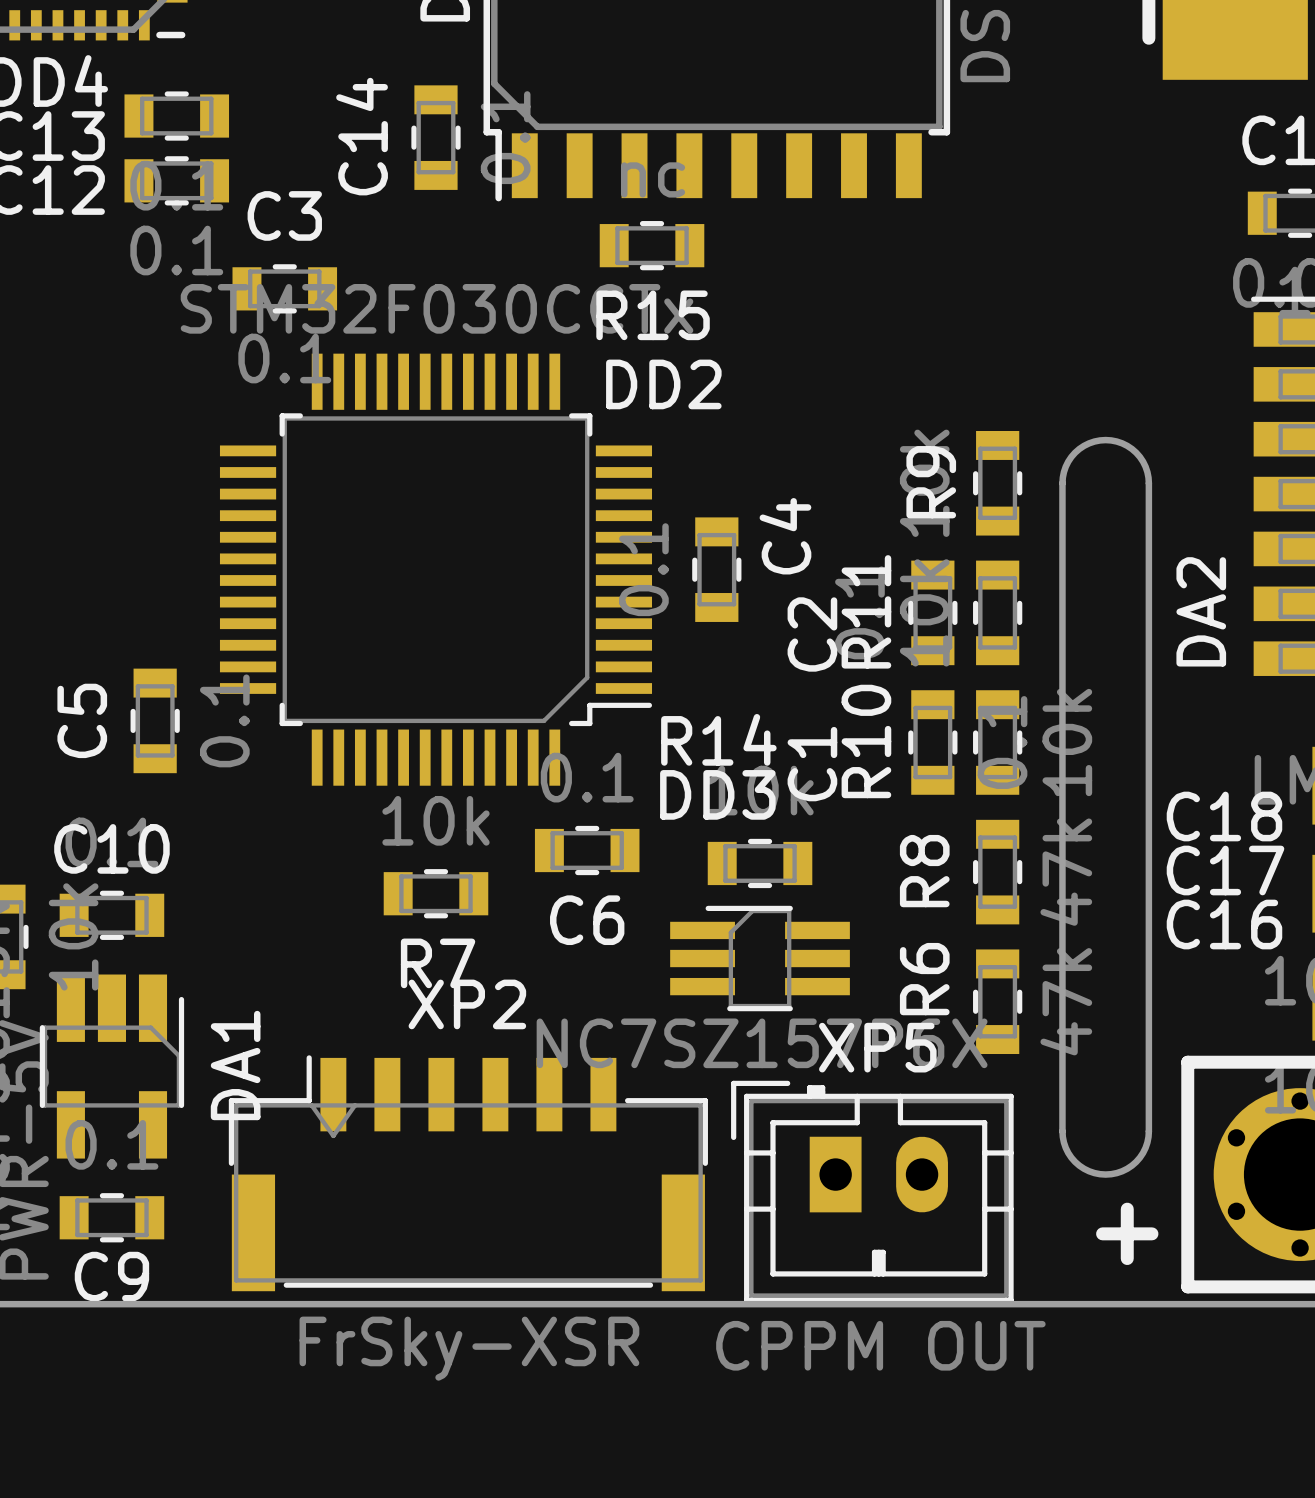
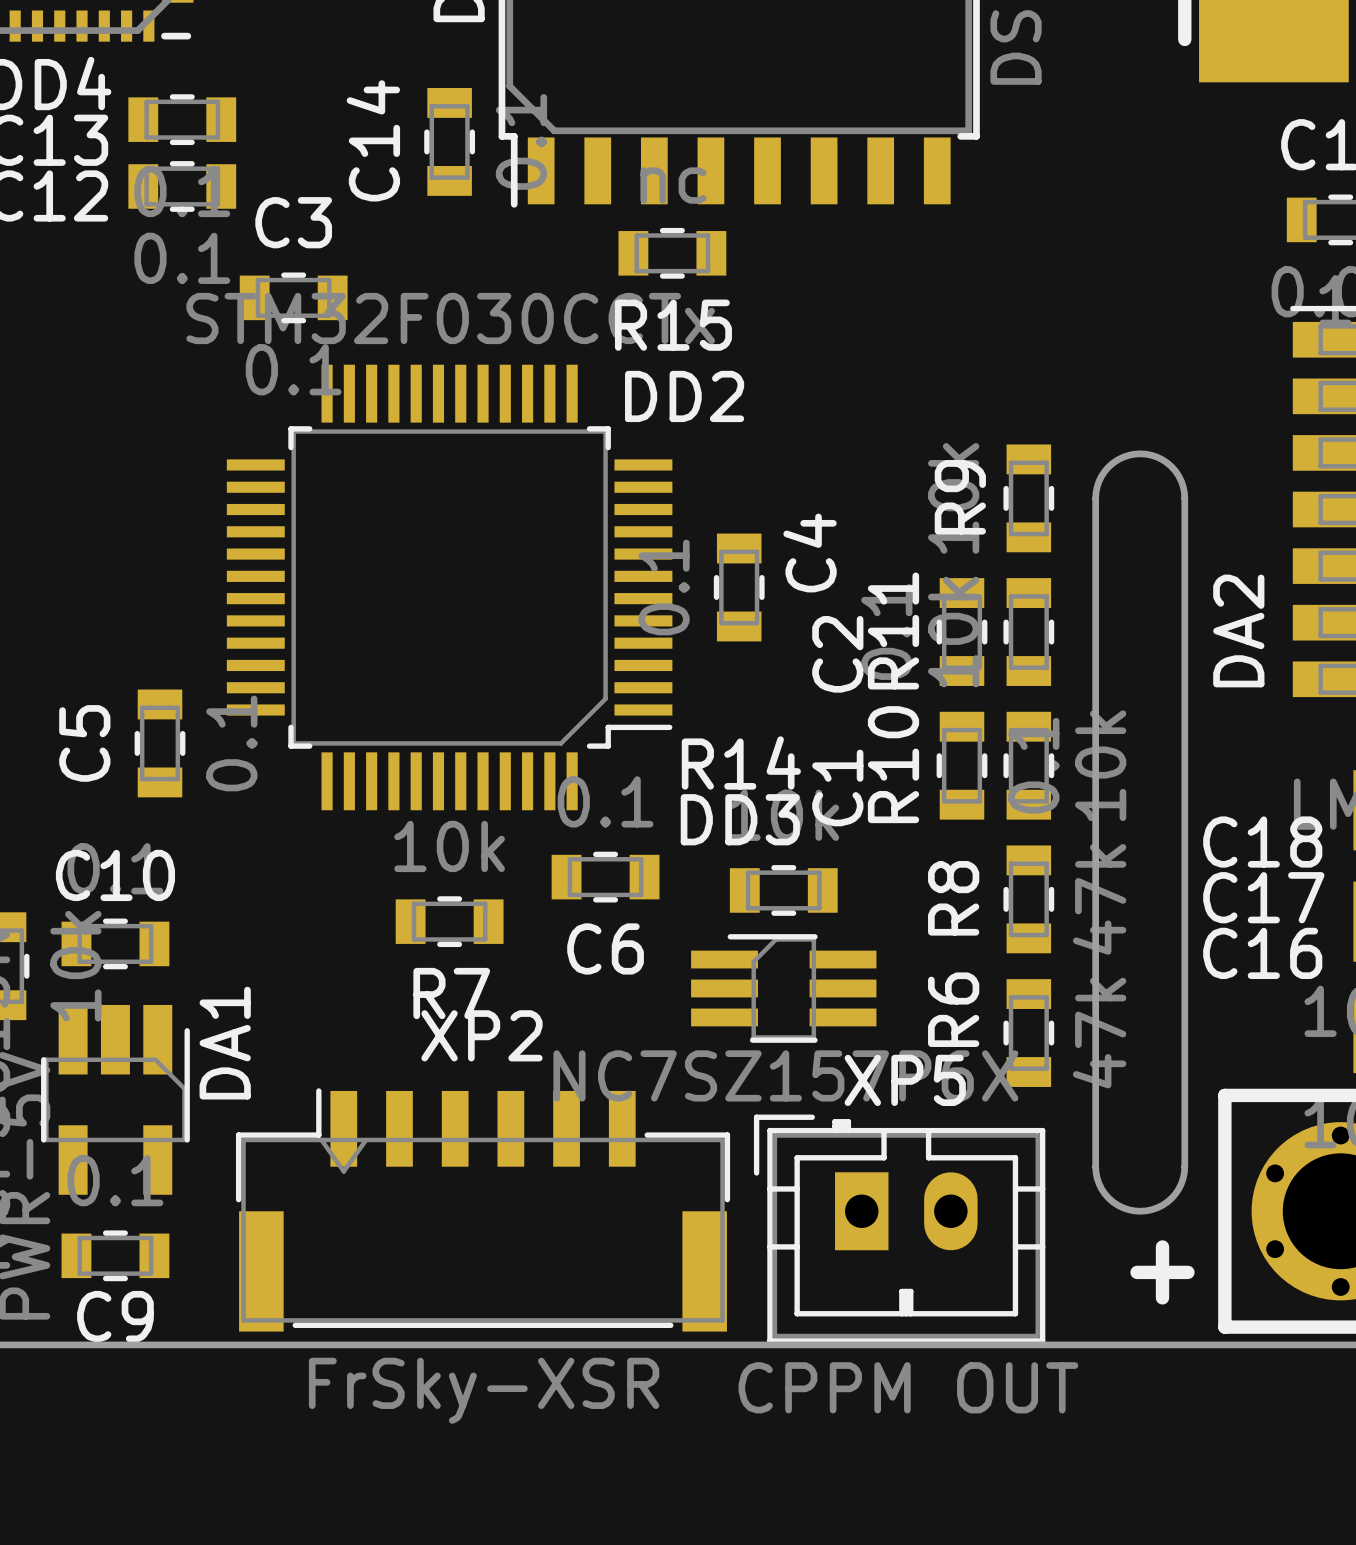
DA1 name position: DA1 (235, 1065) -> DA1 (225, 1043)

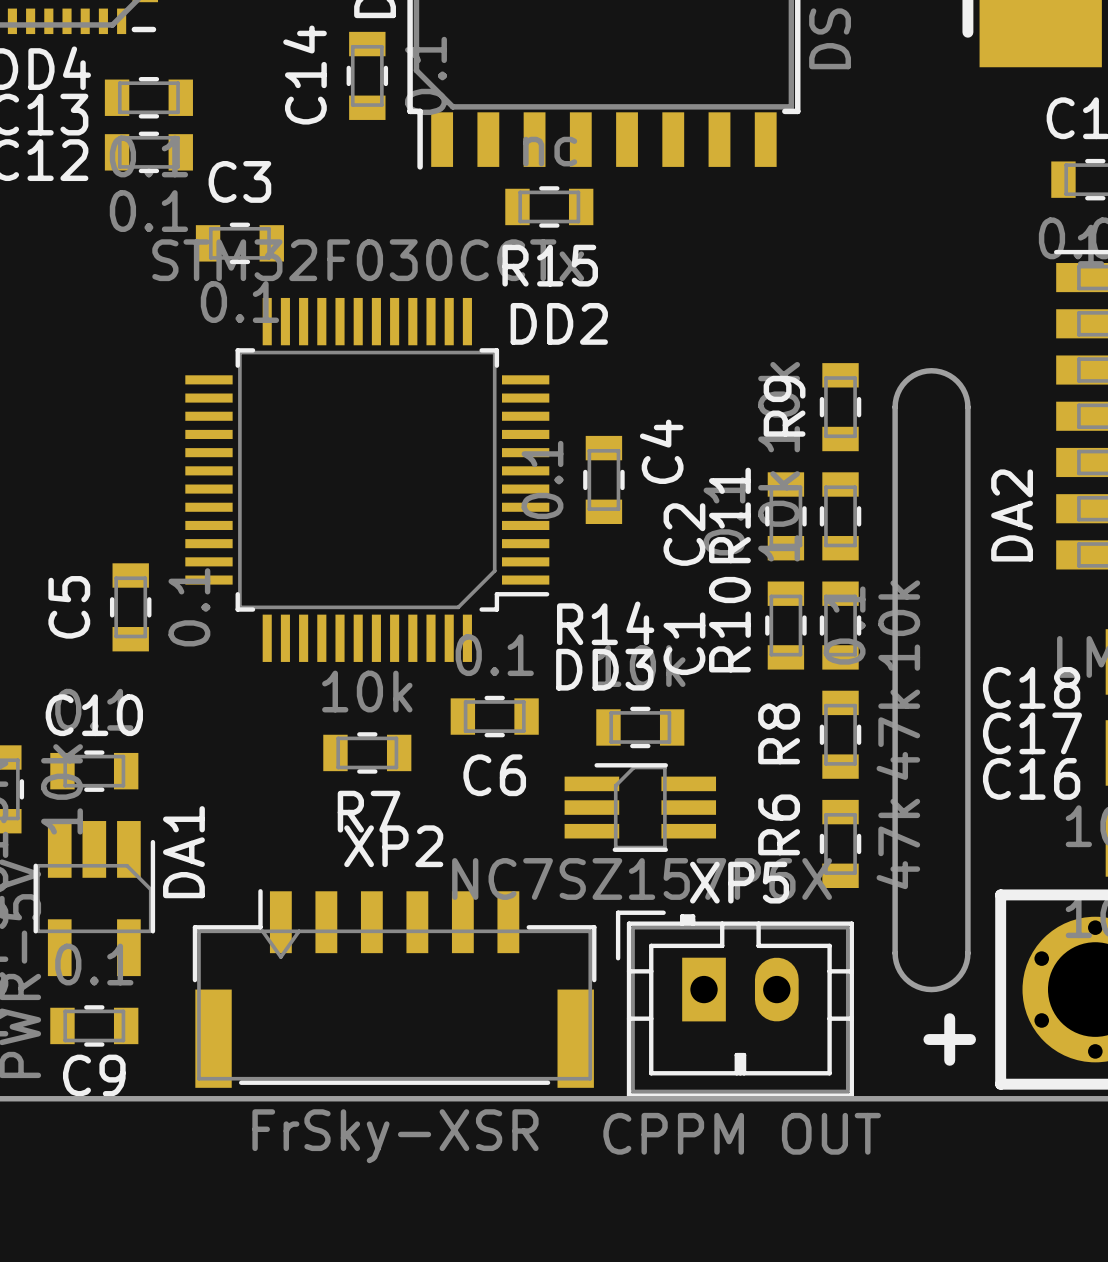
C14 position: (449, 141) -> (367, 75)

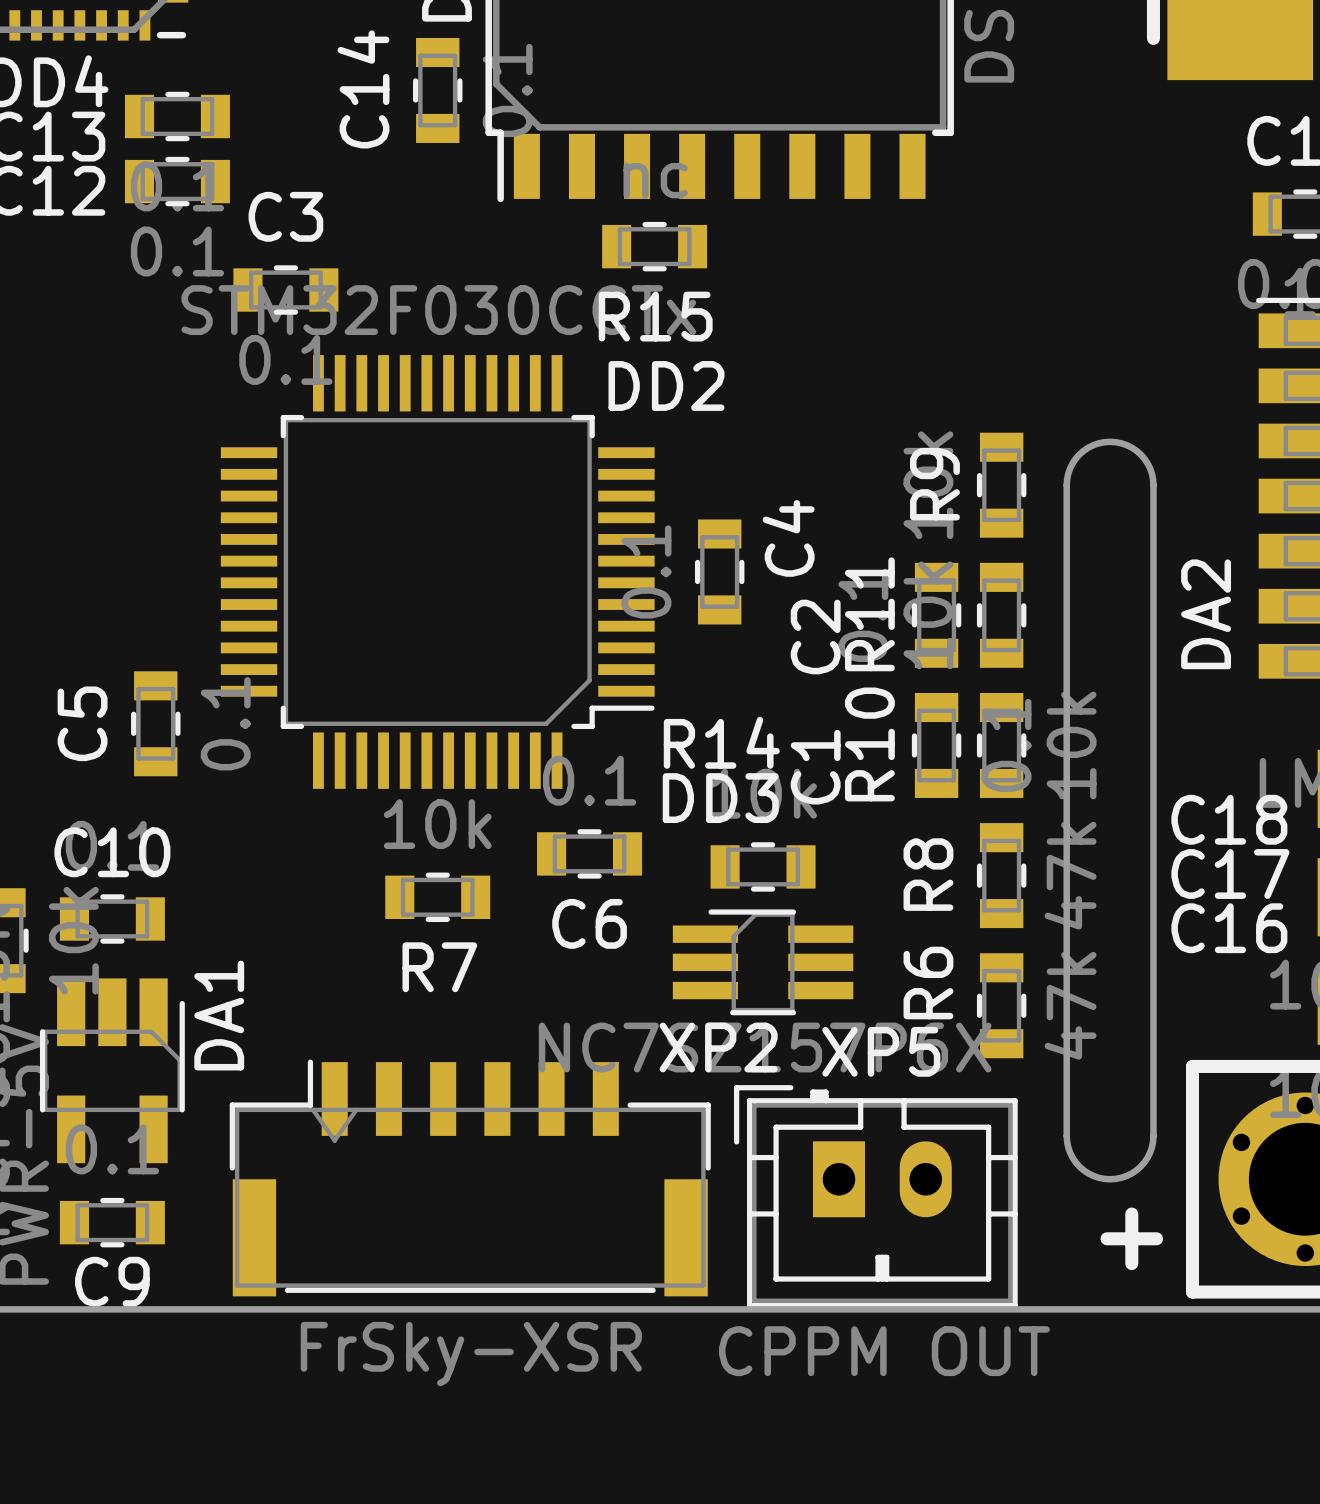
XP2 name position: XP2 (393, 846) -> XP2 (718, 1047)

